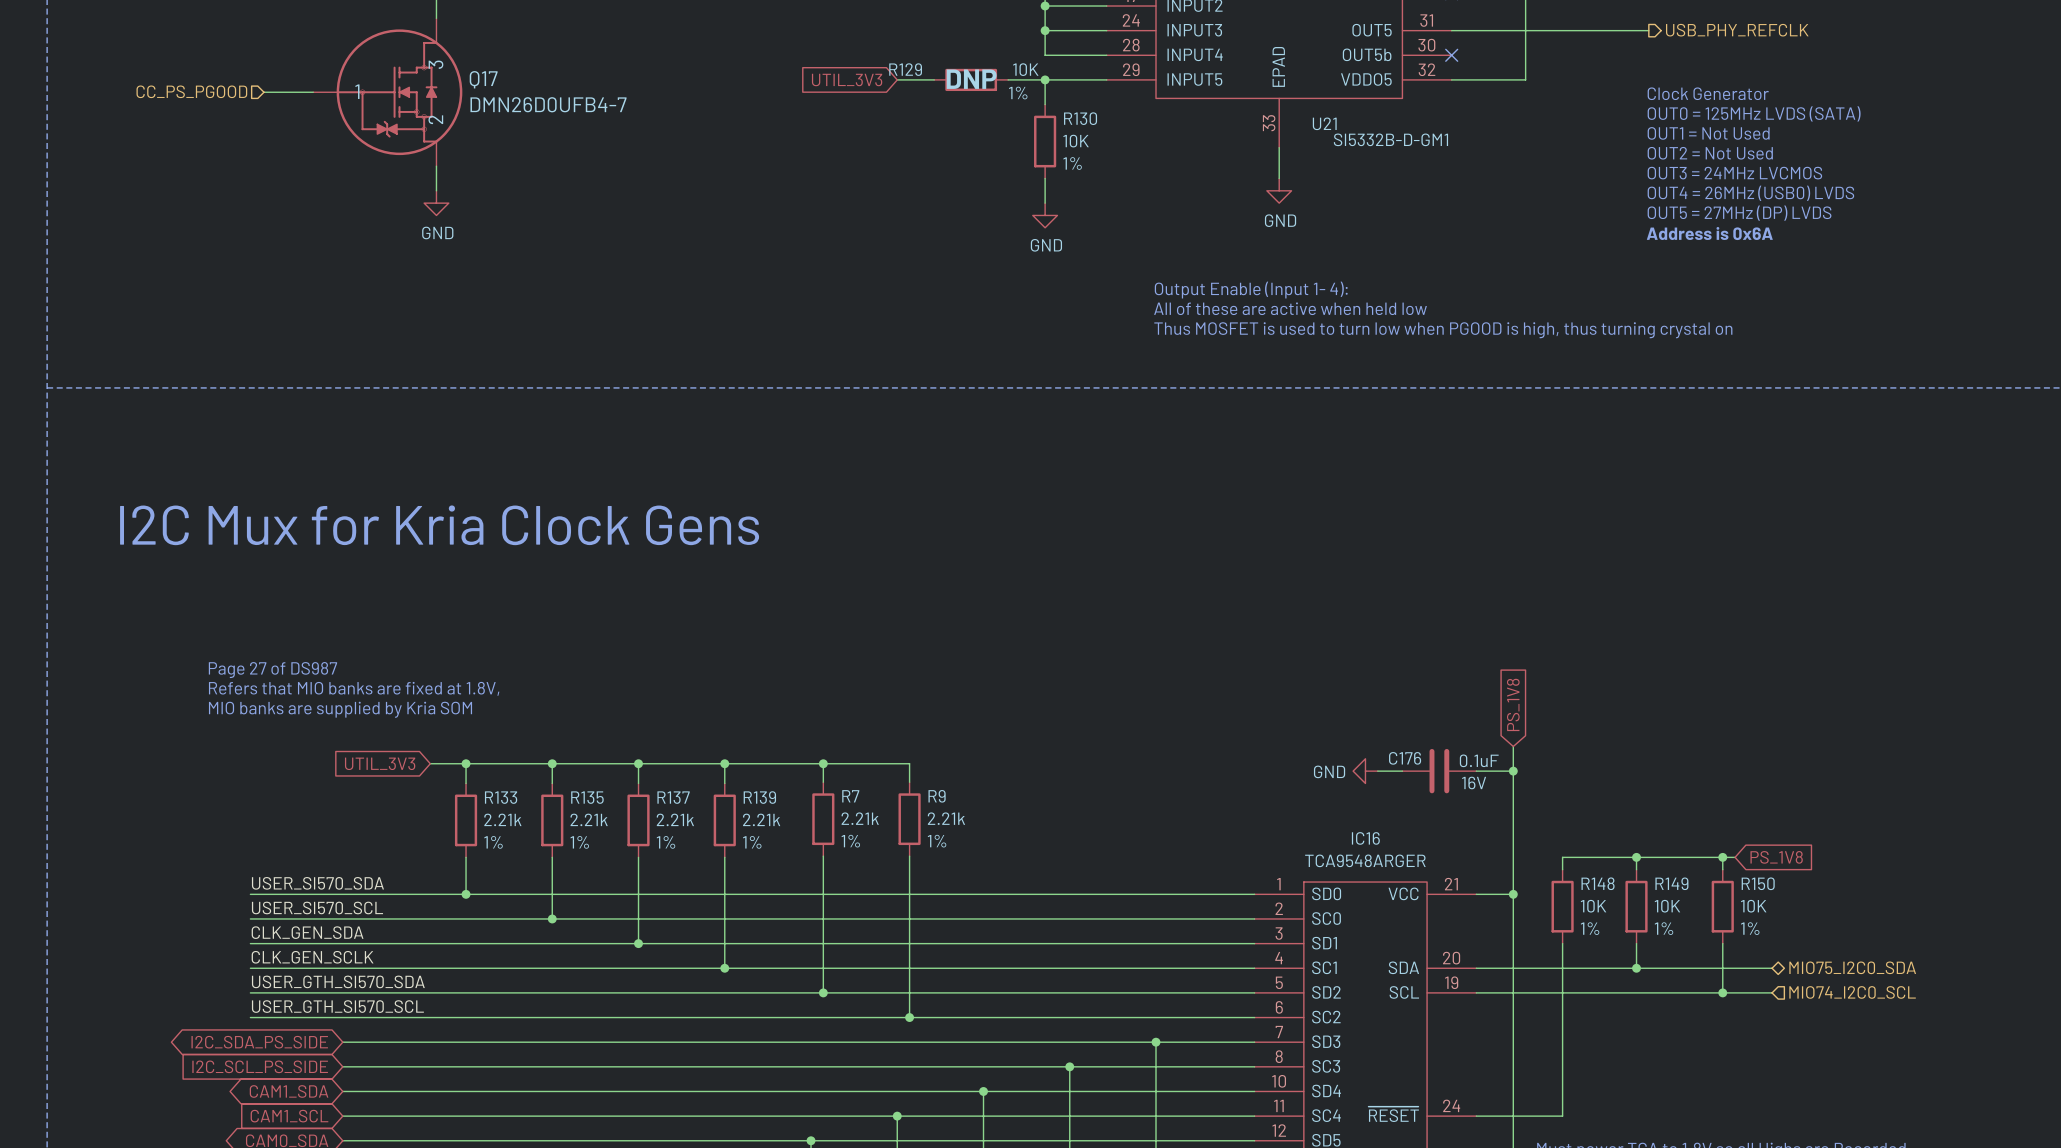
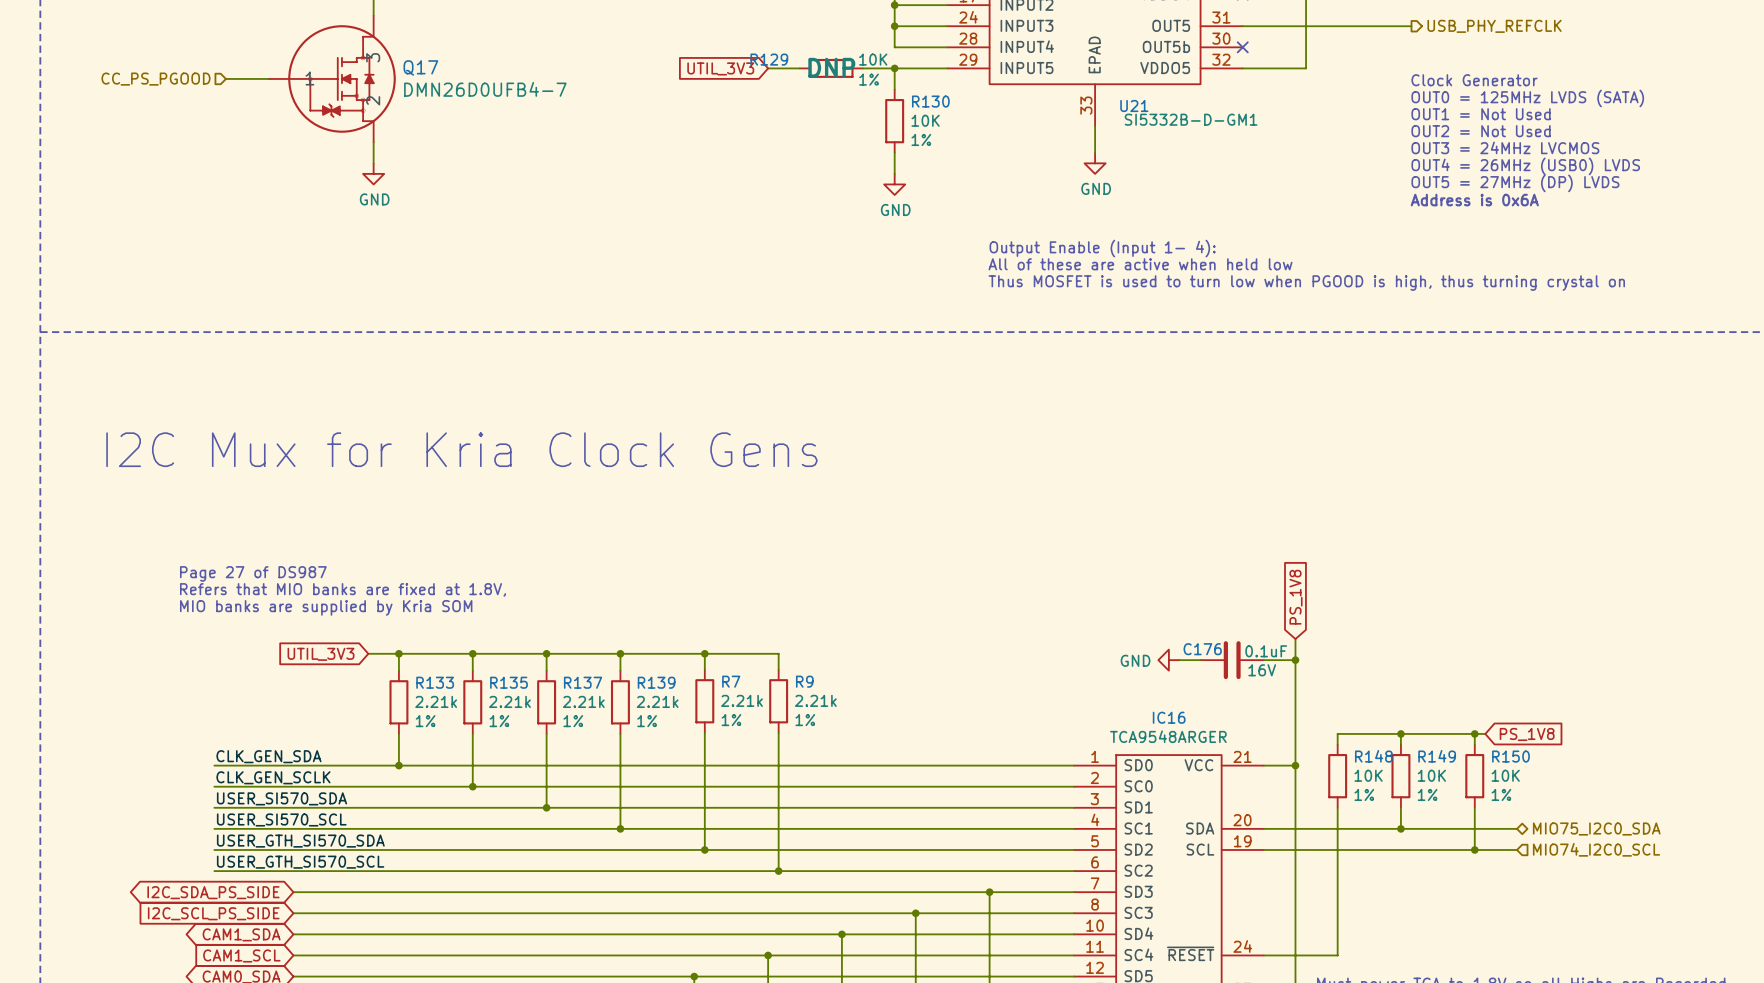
label: USER_SI570_SDA (317, 883) -> CLK_GEN_SDA (268, 756)
label: USER_SI570_SCL (317, 907) -> CLK_GEN_SCLK (273, 777)
label: CLK_GEN_SDA (307, 932) -> USER_SI570_SDA (282, 798)
label: CLK_GEN_SCLK (312, 957) -> USER_SI570_SCL (281, 819)

